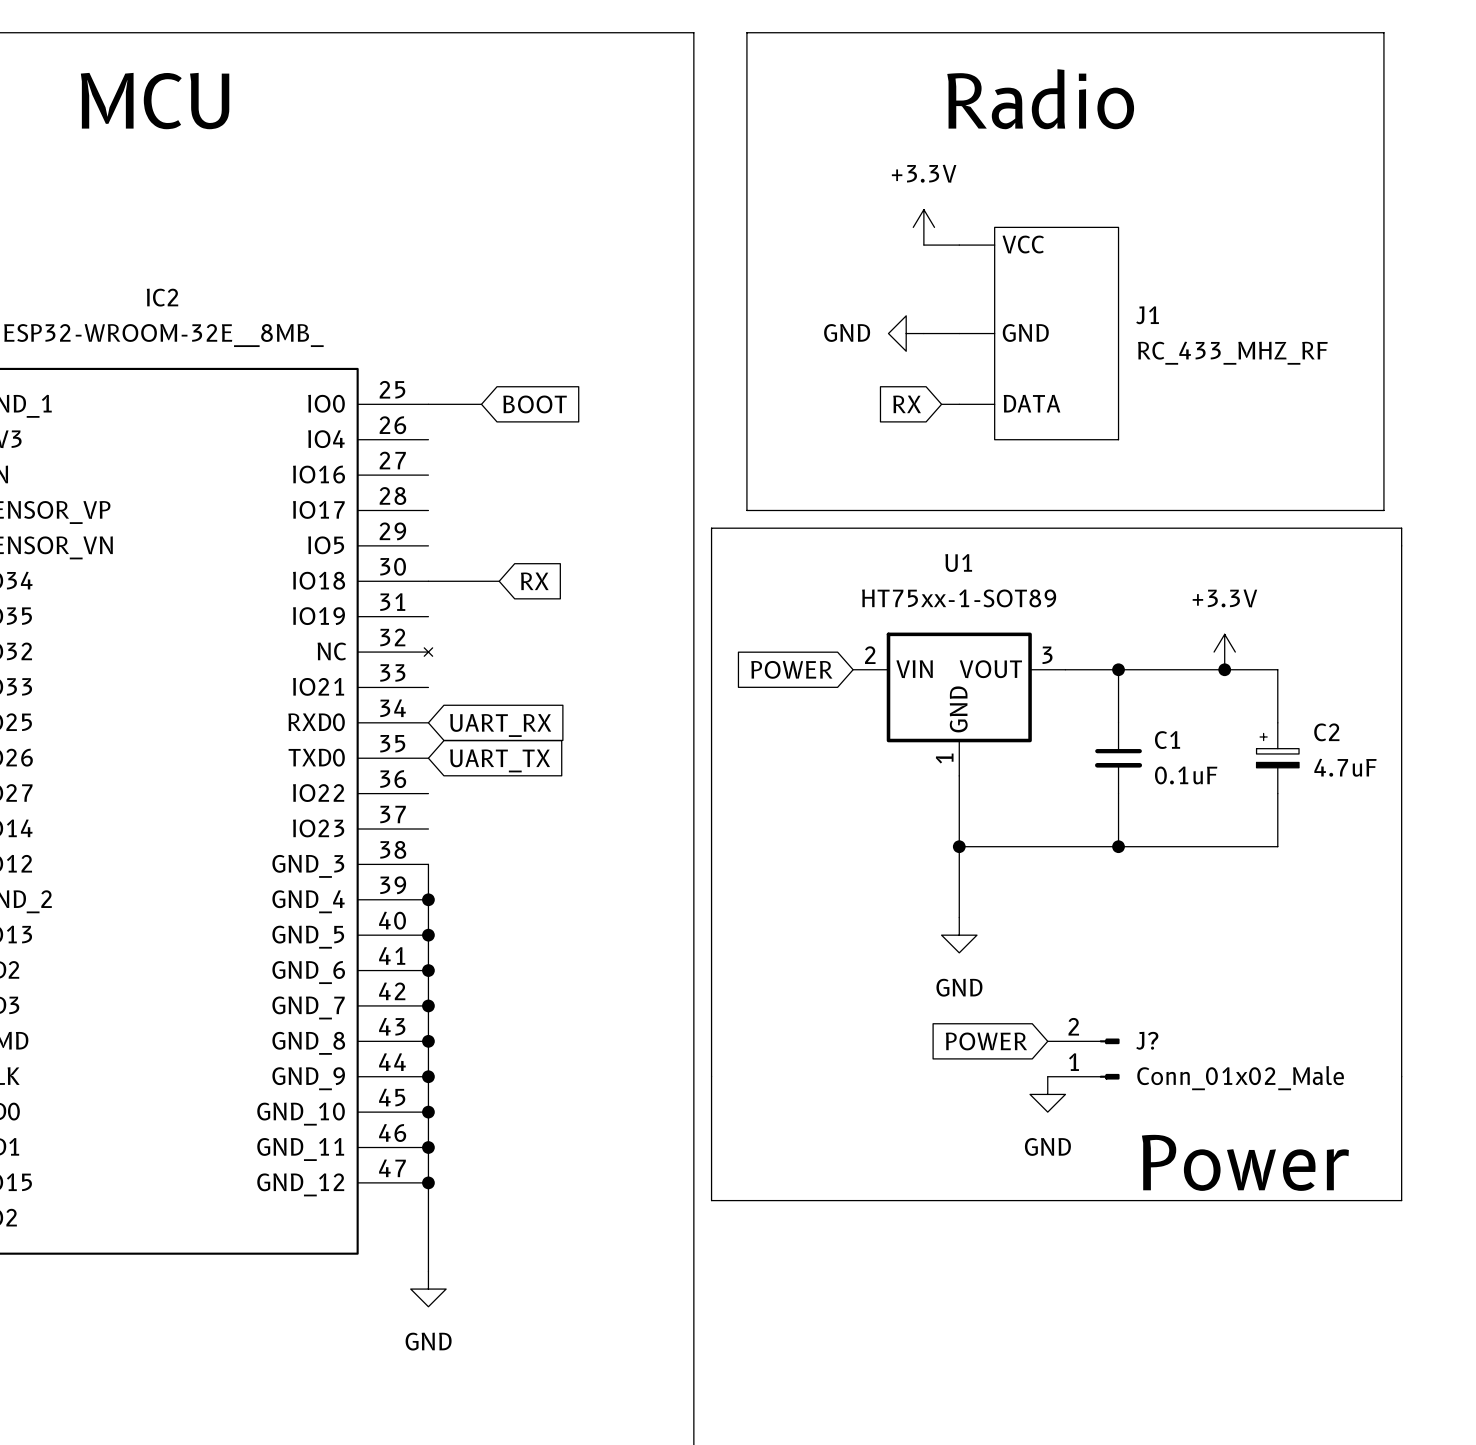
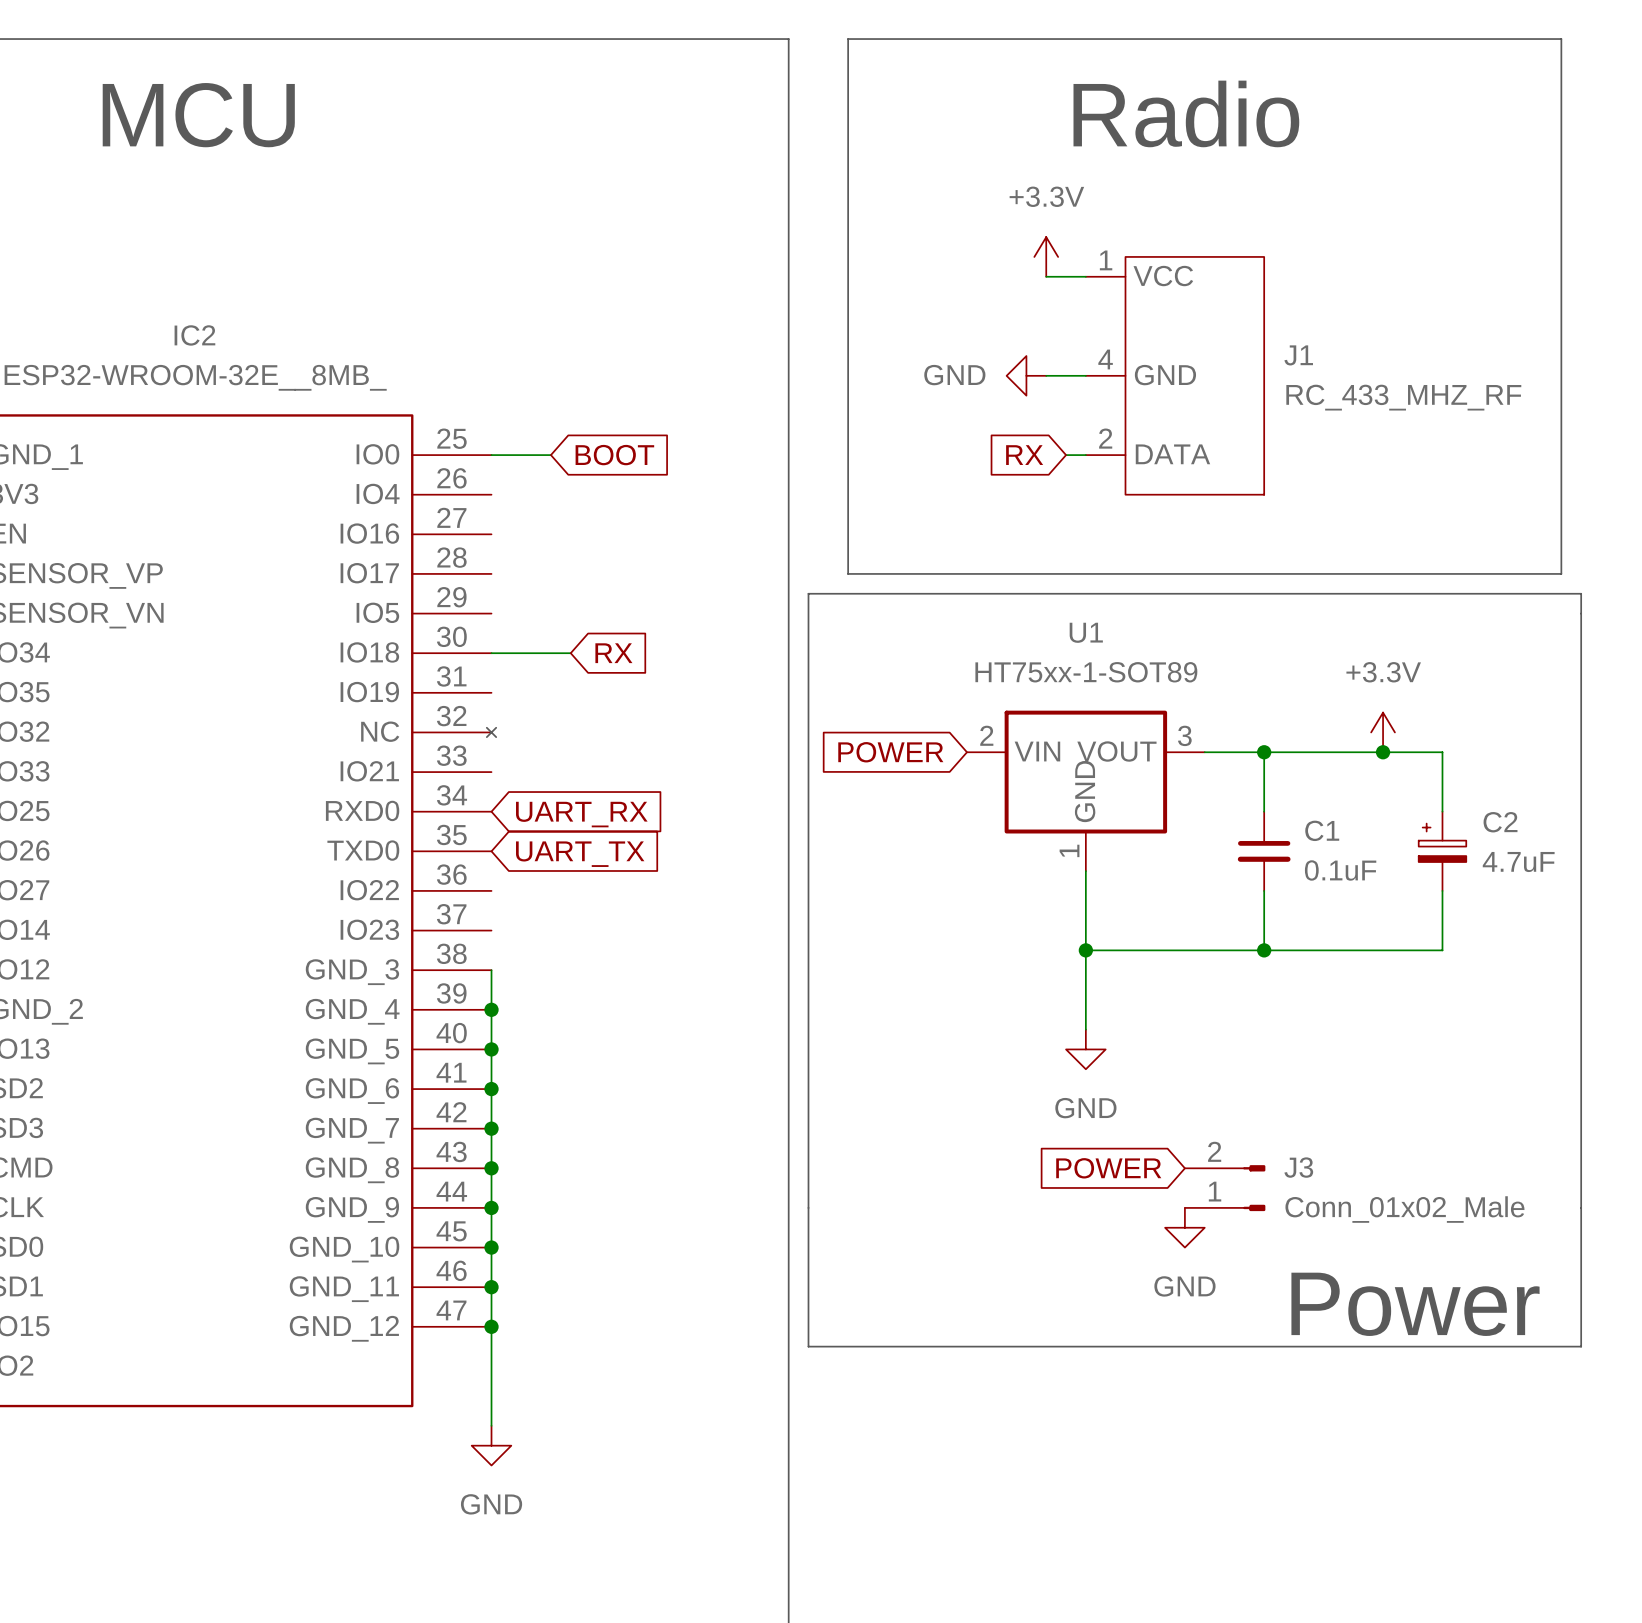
J1 pin number: none -> 1 (1106, 260)
J1 pin number: none -> 4 (1105, 359)
J1 pin number: none -> 2 (1105, 438)
J? name: J? (1147, 1040) -> J3 (1298, 1167)

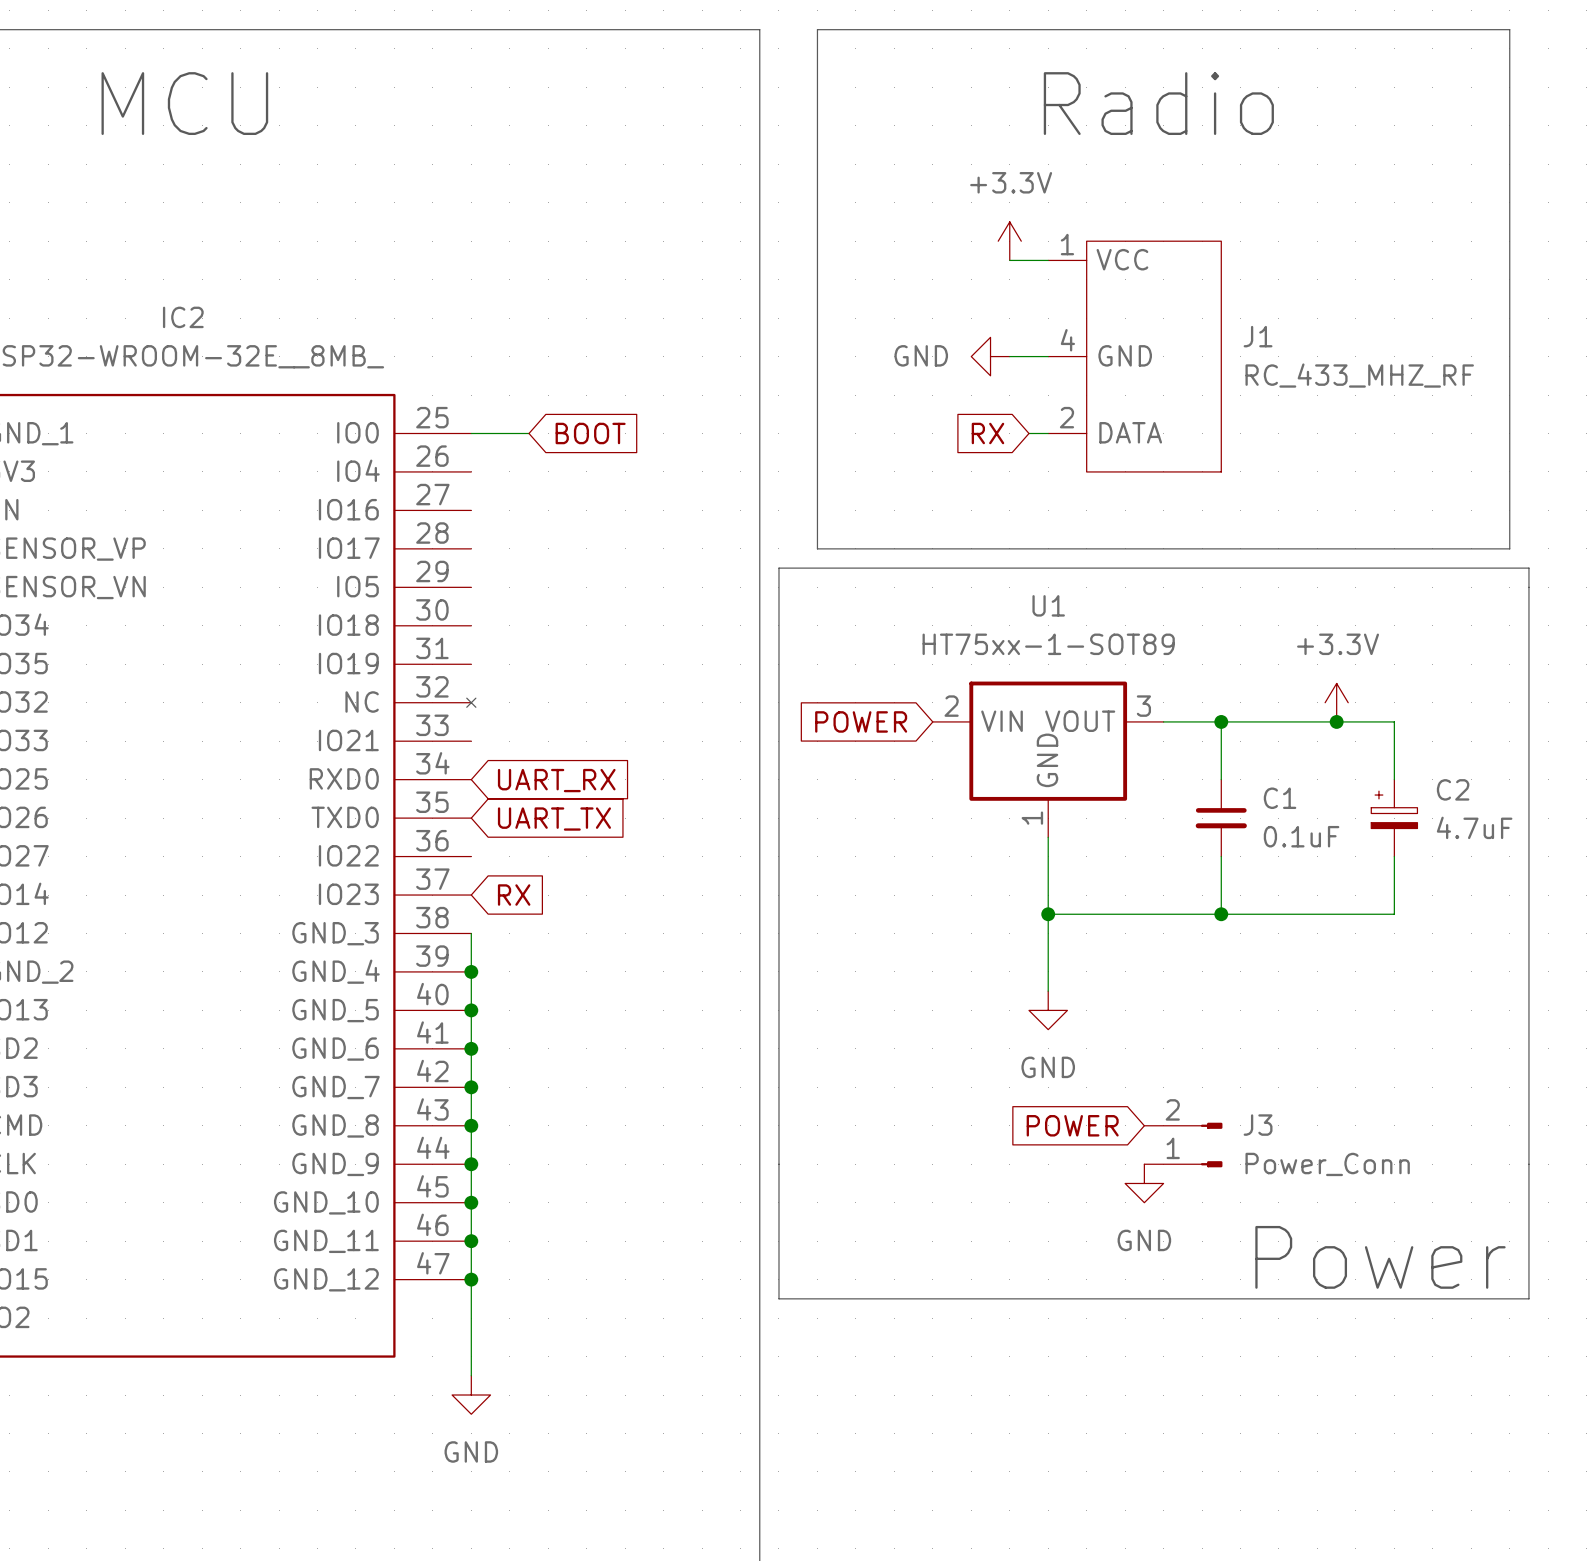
wire: (491, 653) (570, 653) -> none
global label position: RX (613, 653) -> RX (514, 895)
J3 value: Conn_01x02_Male (1404, 1209) -> Power_Conn (1327, 1164)

